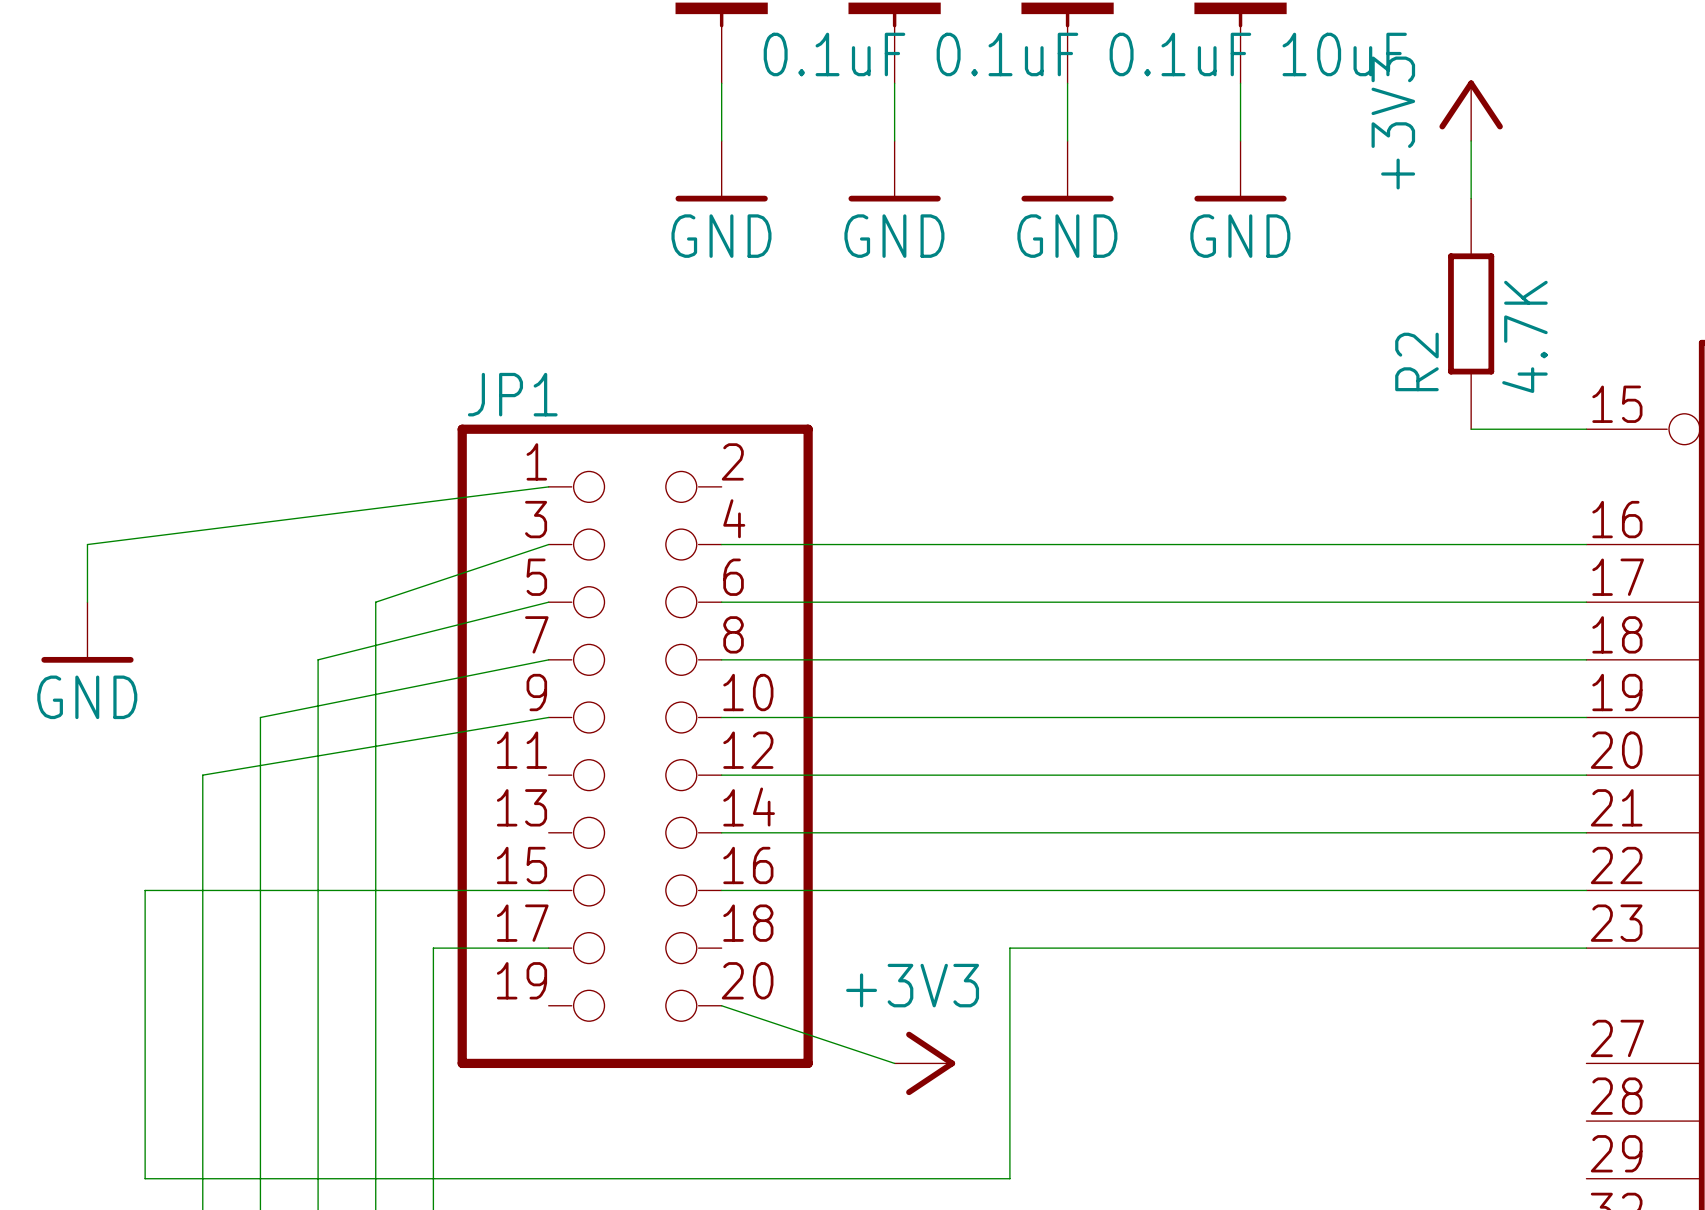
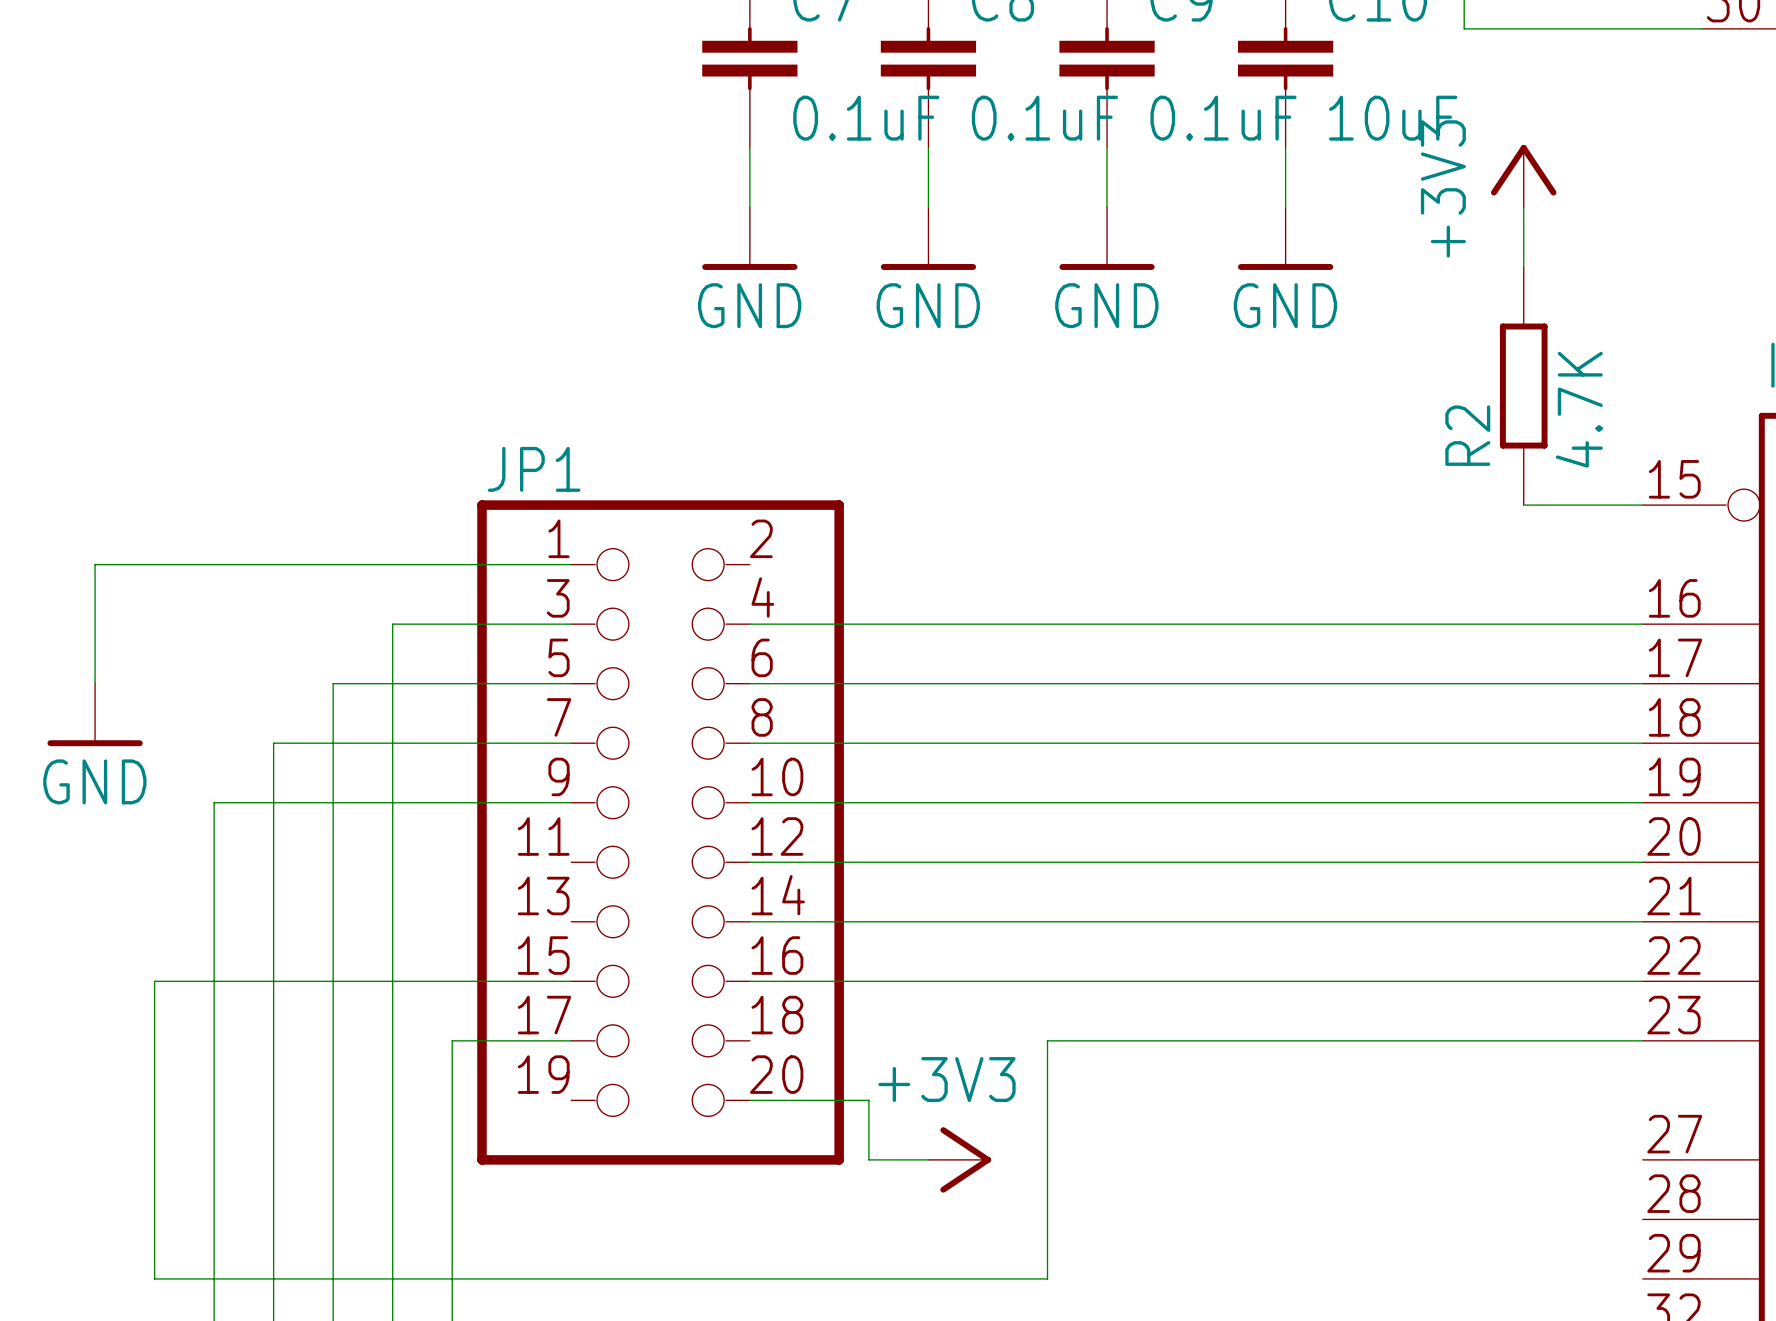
wire: (548, 486) (87, 544) -> (571, 564) (95, 564) (95, 624)
wire: (548, 544) (375, 602) -> (571, 624) (392, 624) (392, 683)
wire: (548, 602) (318, 659) -> (571, 683) (333, 683) (333, 743)
wire: (548, 659) (260, 717) -> (571, 743) (273, 743) (273, 802)
wire: (548, 717) (202, 775) -> (571, 802) (214, 802) (214, 862)
wire: (721, 1005) (894, 1063) -> (749, 1100) (868, 1100) (868, 1159) (928, 1159)

